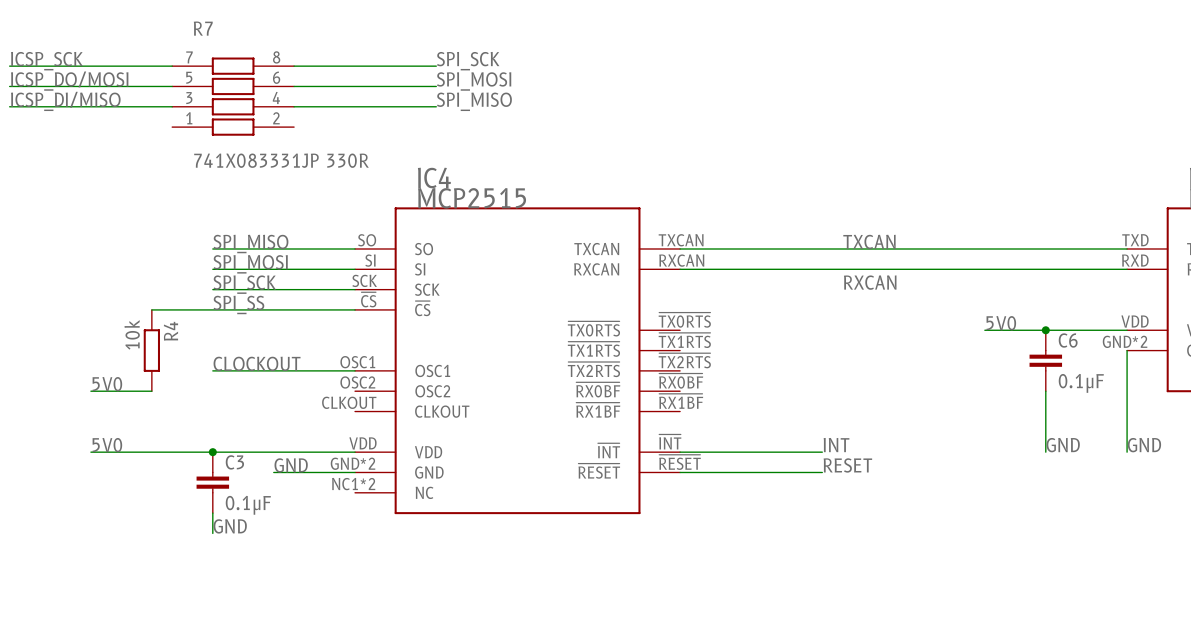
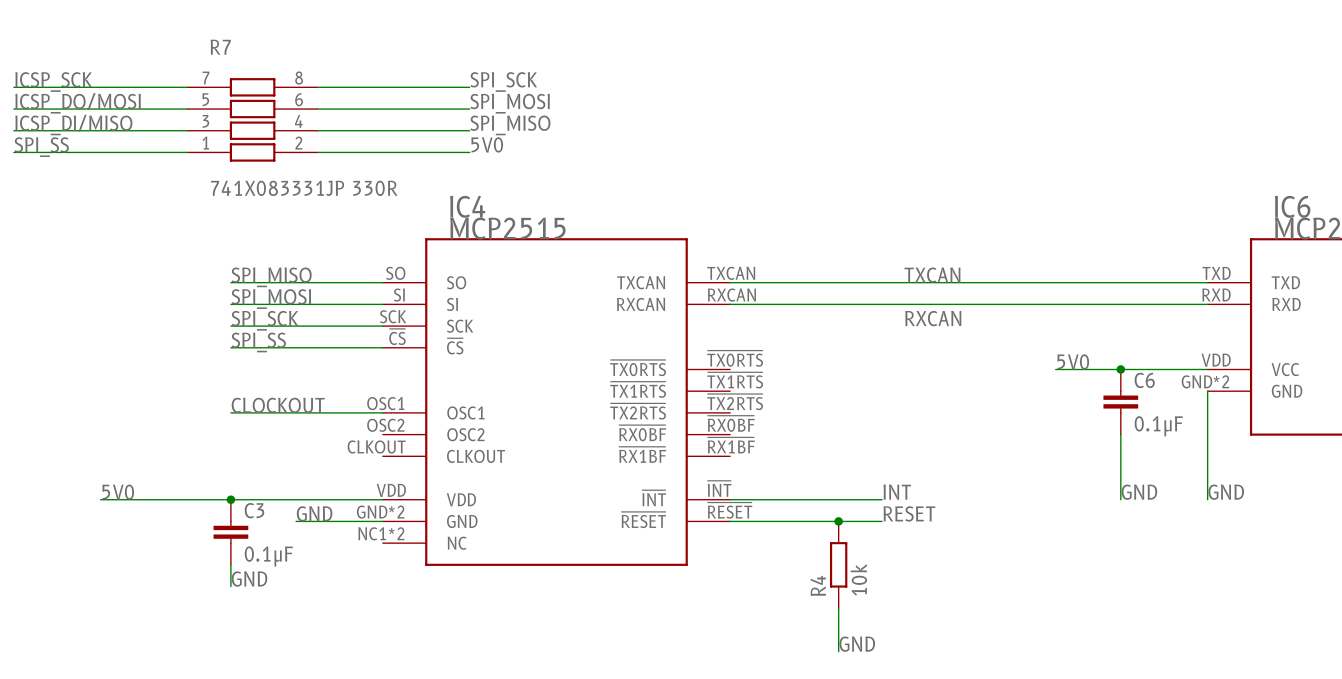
label: none -> 5V0 (487, 144)
label: none -> SPI_SS (41, 147)
wire: none -> (13, 152) (187, 152)
wire: none -> (317, 152) (469, 152)
wire: (151, 309) (212, 309) -> none
R4 name position: R4 (170, 331) -> R4 (818, 585)
R4 value position: 10k (132, 334) -> 10k (858, 579)
R4 position: (151, 350) -> (838, 564)
label: 5V0 (107, 384) -> none
wire: (90, 391) (151, 391) -> none
junction: none -> (838, 521)
wire: none -> (838, 608) (838, 651)
label: none -> GND (857, 644)

